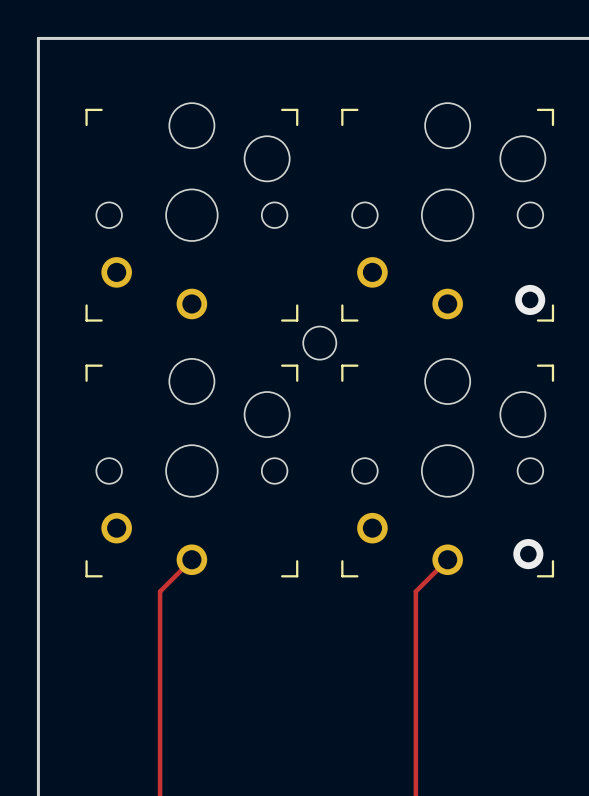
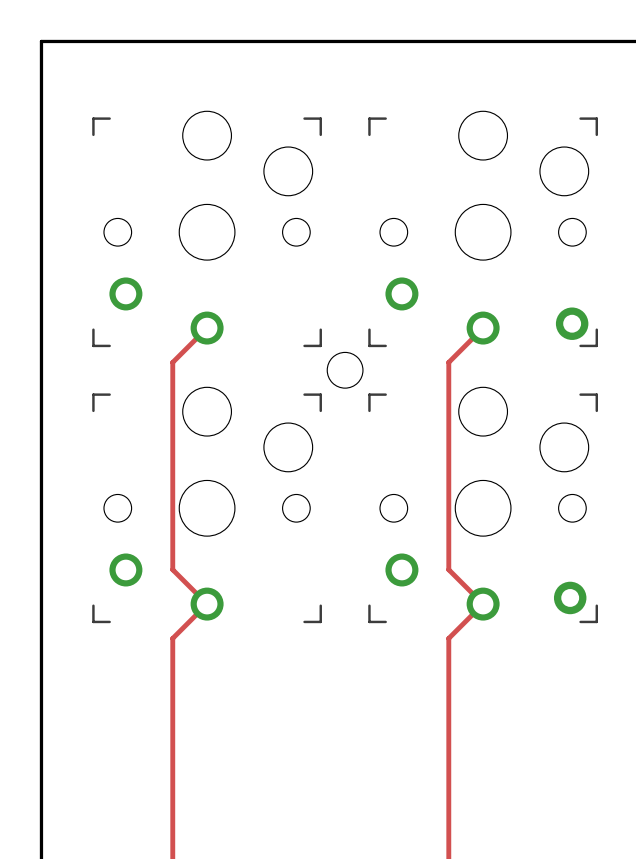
track: none -> (207, 328) (172, 362) (172, 569) (207, 604)
track: none -> (483, 328) (448, 362) (448, 569) (483, 604)

